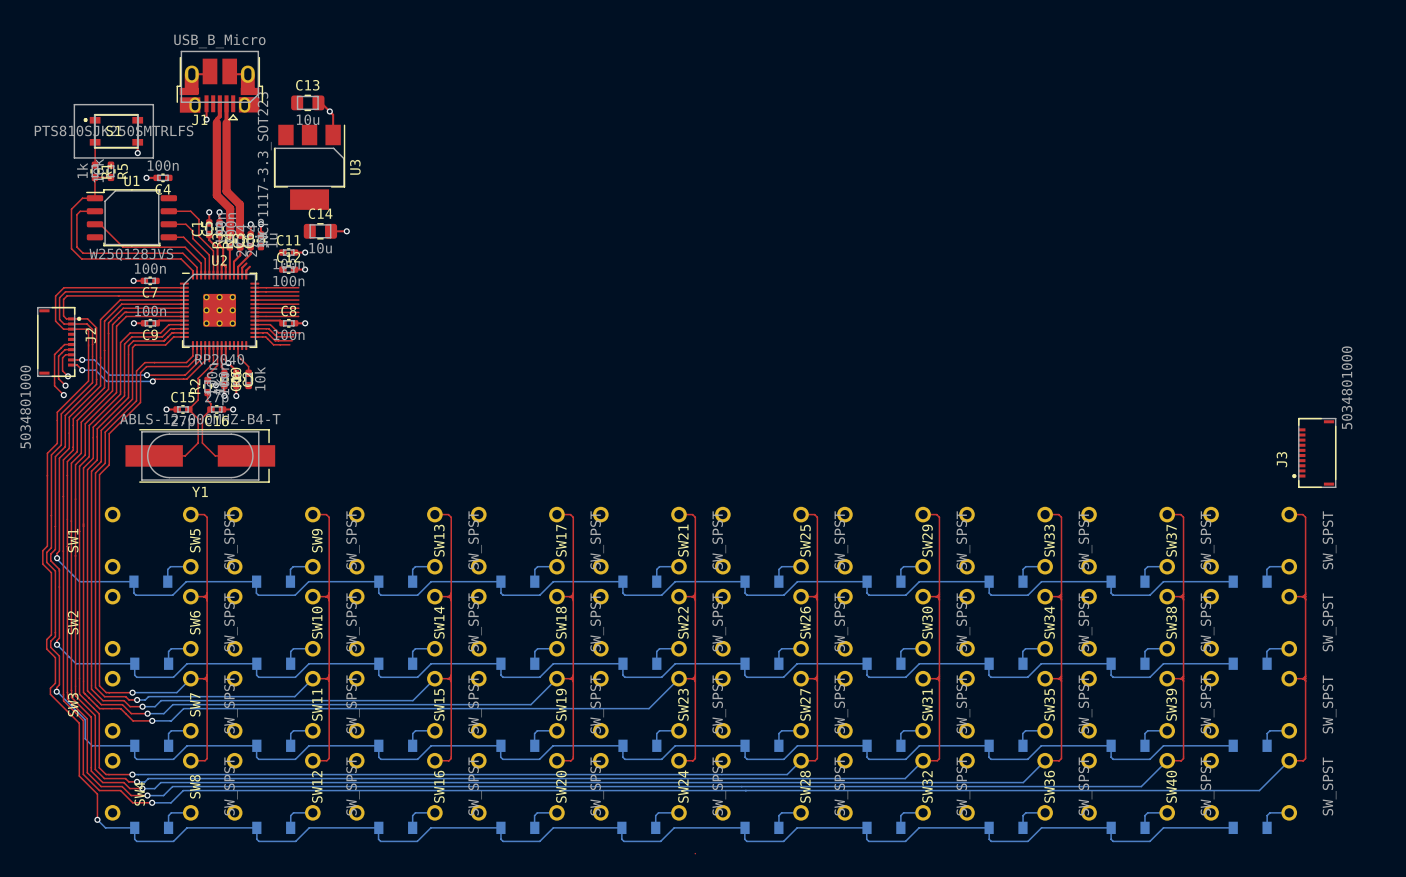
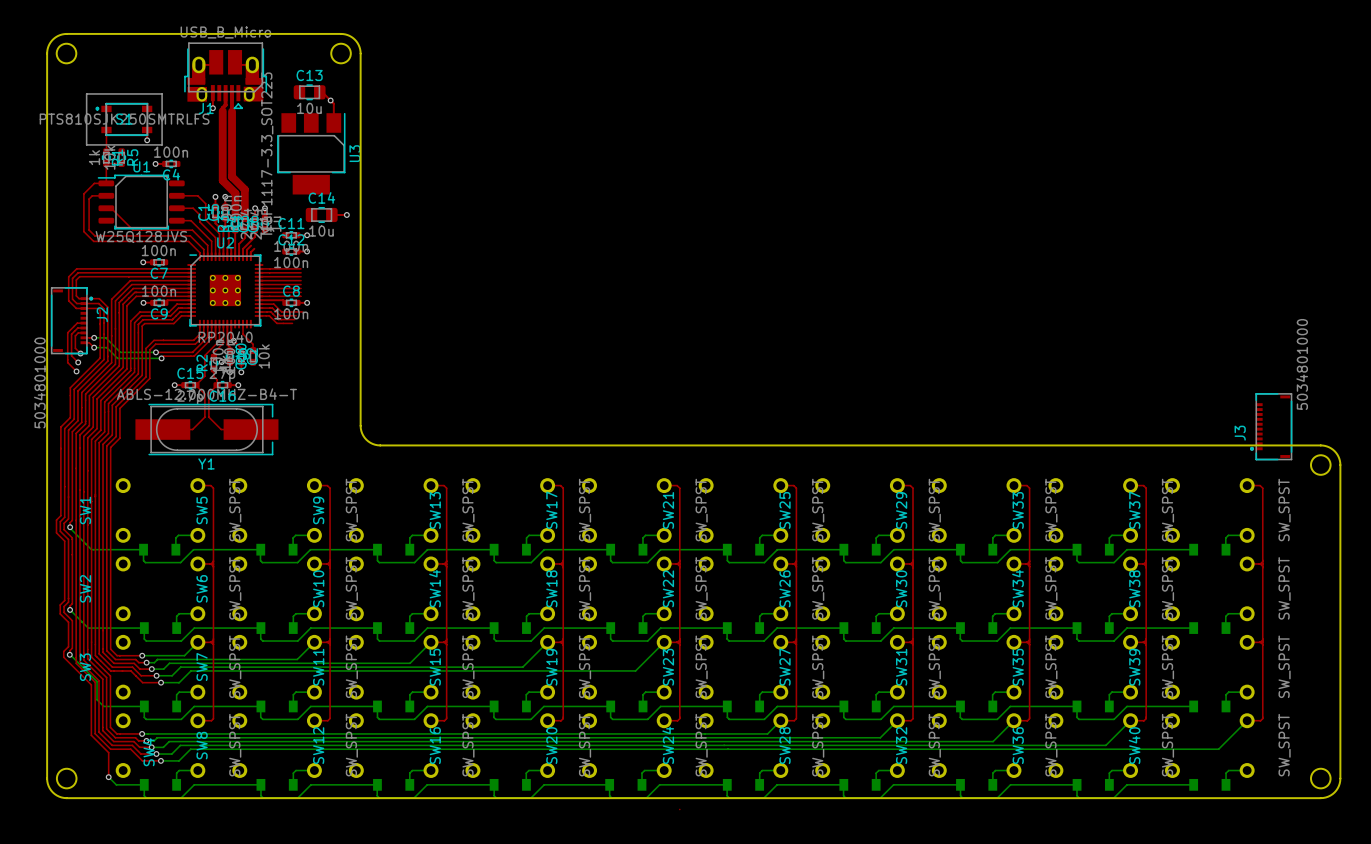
board edge: none -> (66, 33) (341, 33) (349, 35) (356, 41) (360, 53) (360, 425) (364, 437) (375, 444) (1320, 445) (1331, 448) (1338, 456) (1340, 465) (1340, 778) (1337, 788) (1330, 795) (1320, 798) (66, 798) (56, 795) (49, 788) (47, 778) (47, 53) (52, 39) (66, 33)
round board edge: none -> [55, 42, 78, 65]
round board edge: none -> [330, 42, 352, 65]
round board edge: none -> [1310, 454, 1332, 476]
round board edge: none -> [55, 767, 78, 790]
round board edge: none -> [1310, 767, 1332, 790]

